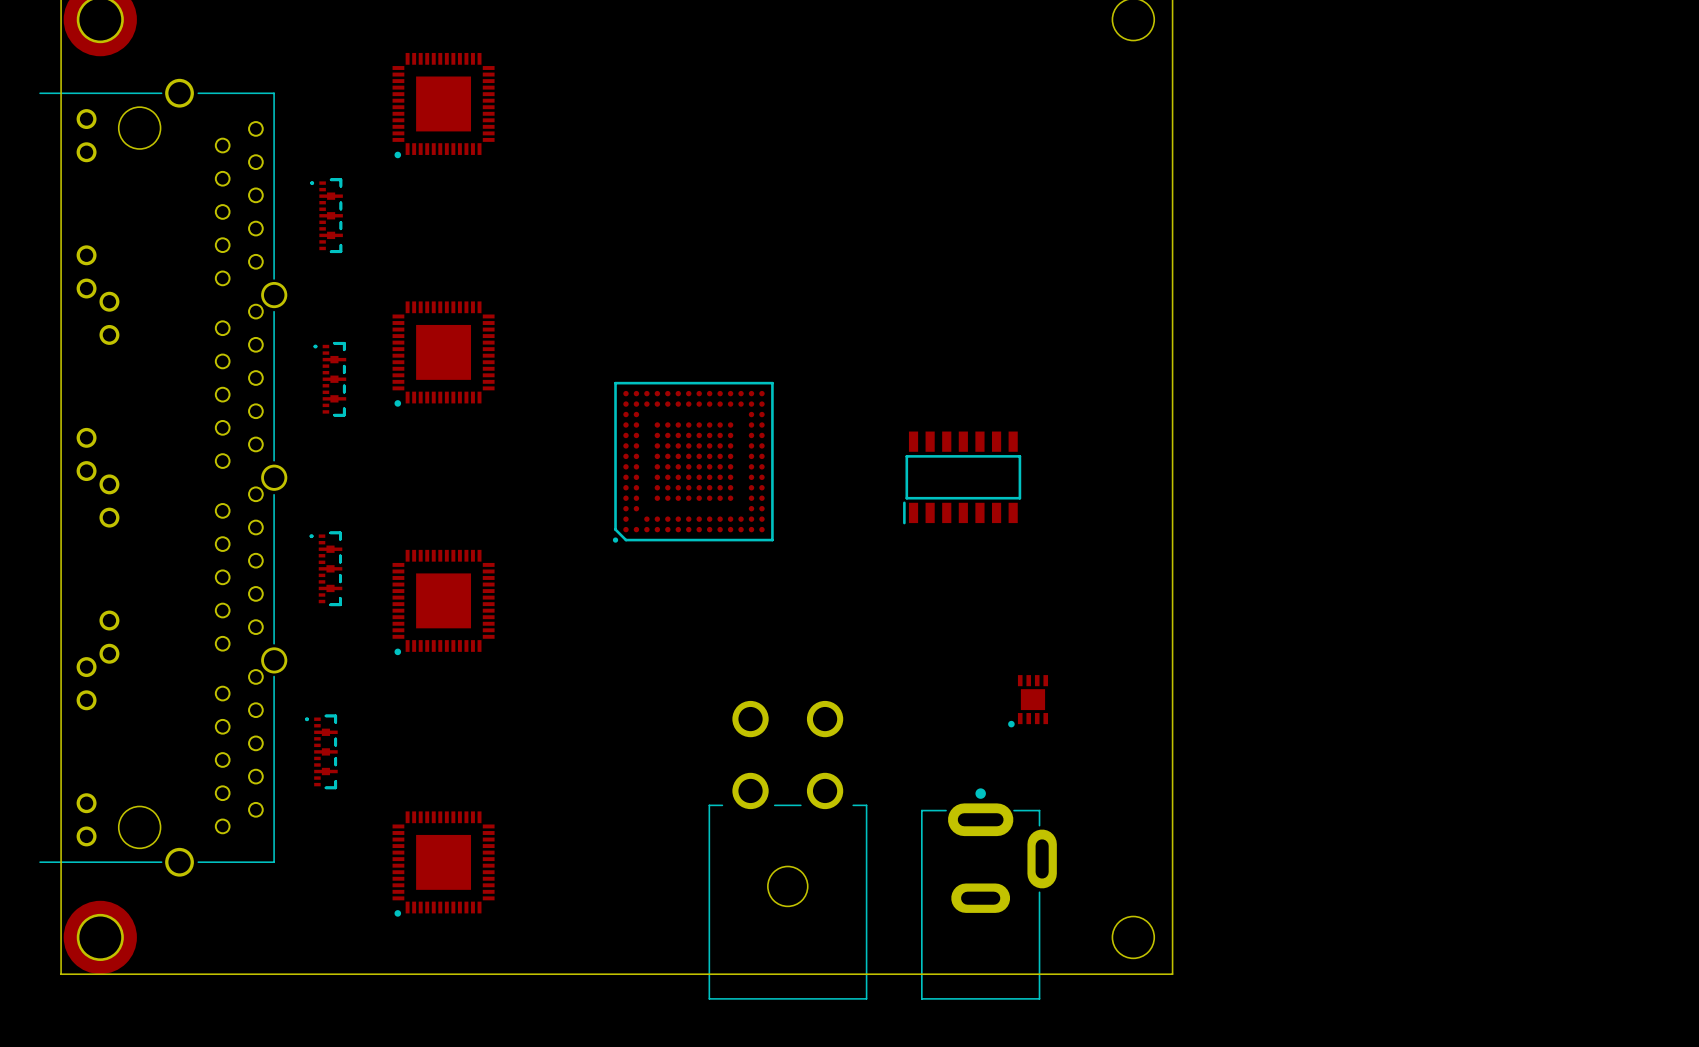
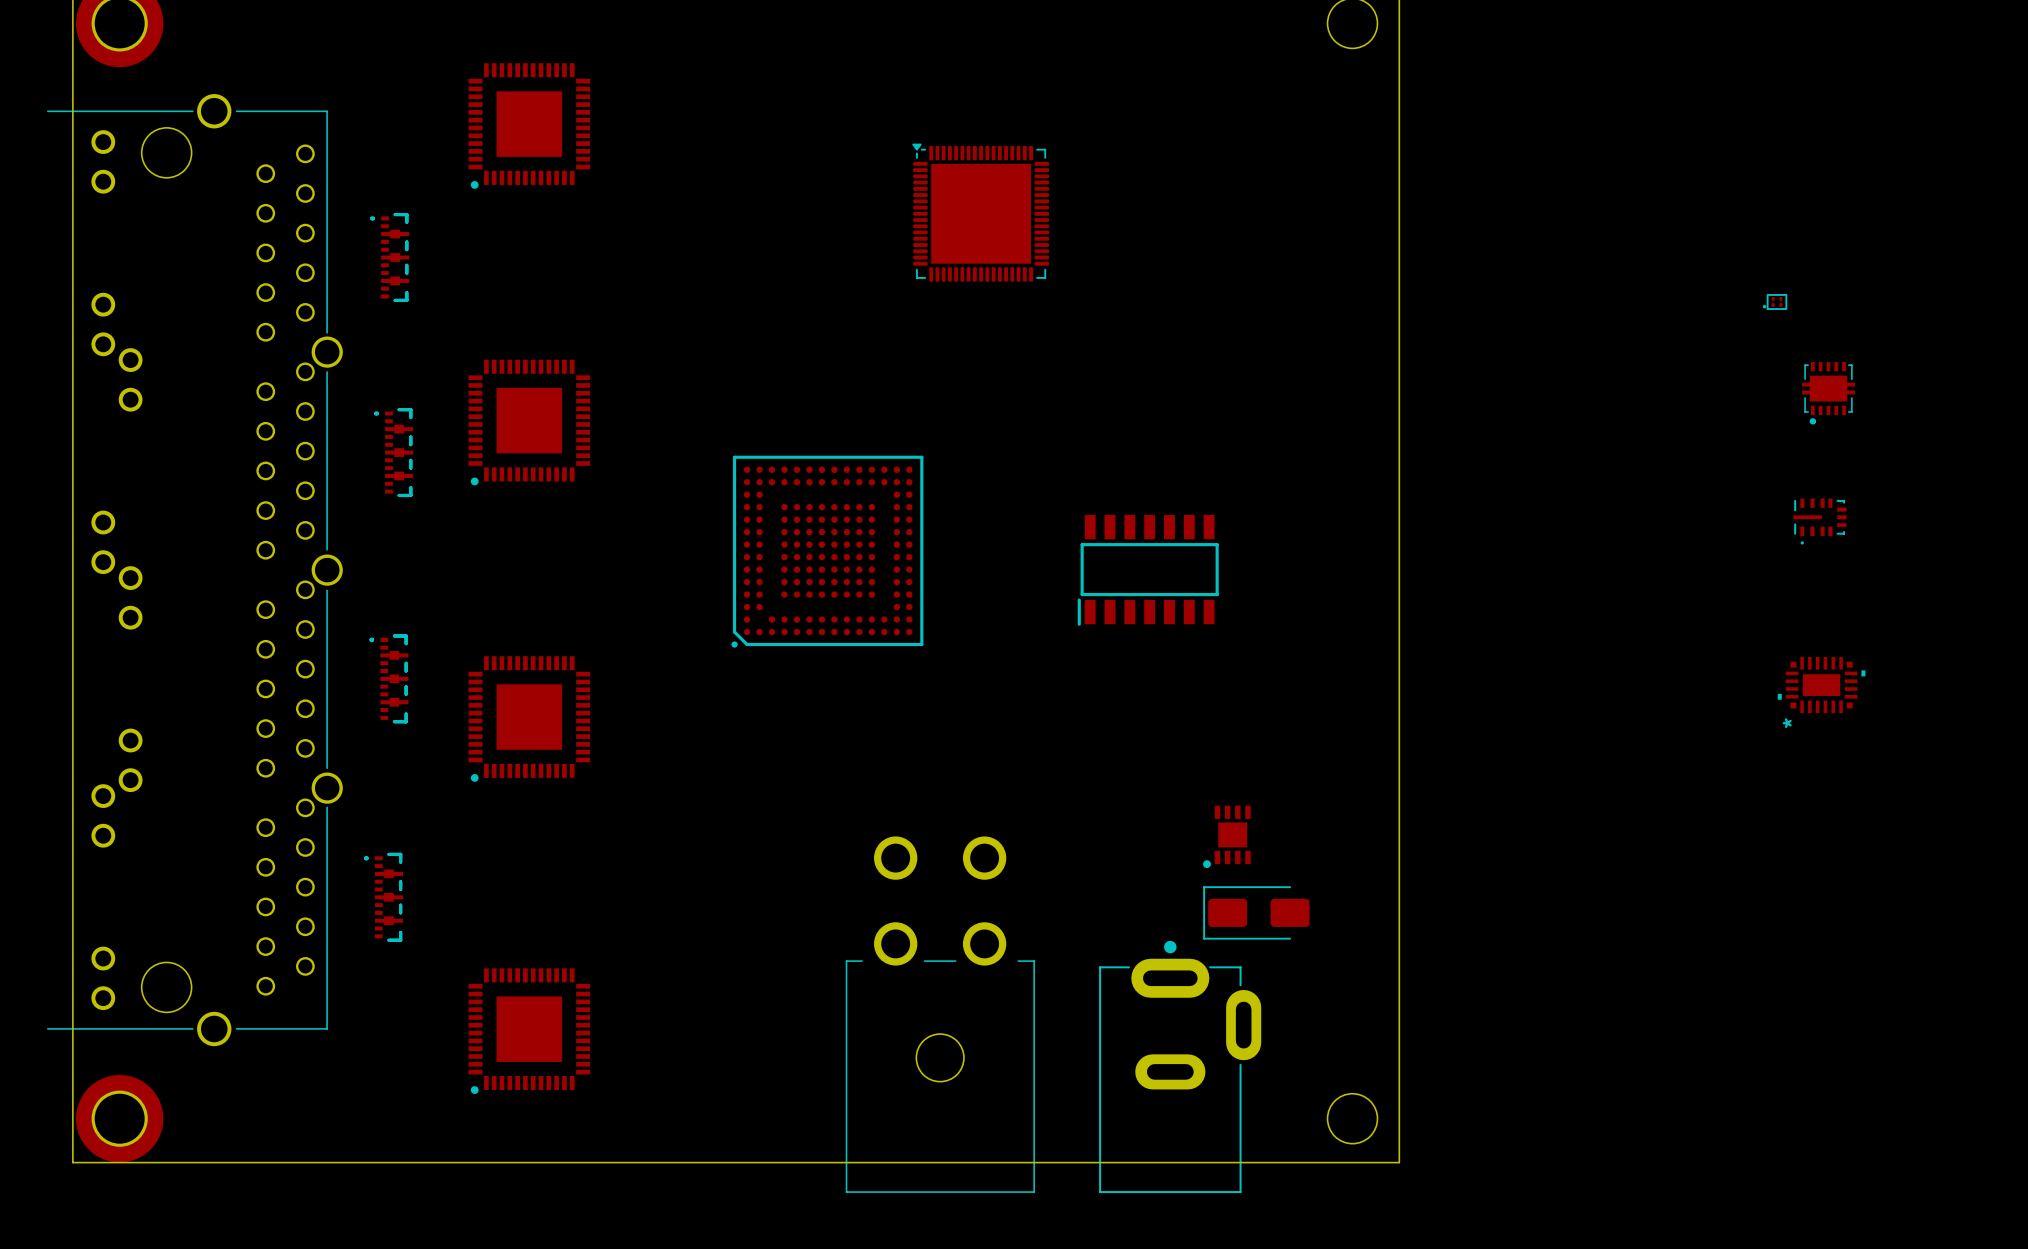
part: none -> (980, 212)
part: none -> (1775, 301)
part: none -> (1828, 393)
part: none -> (1819, 521)
part: none -> (1821, 685)
part: none -> (1256, 912)

